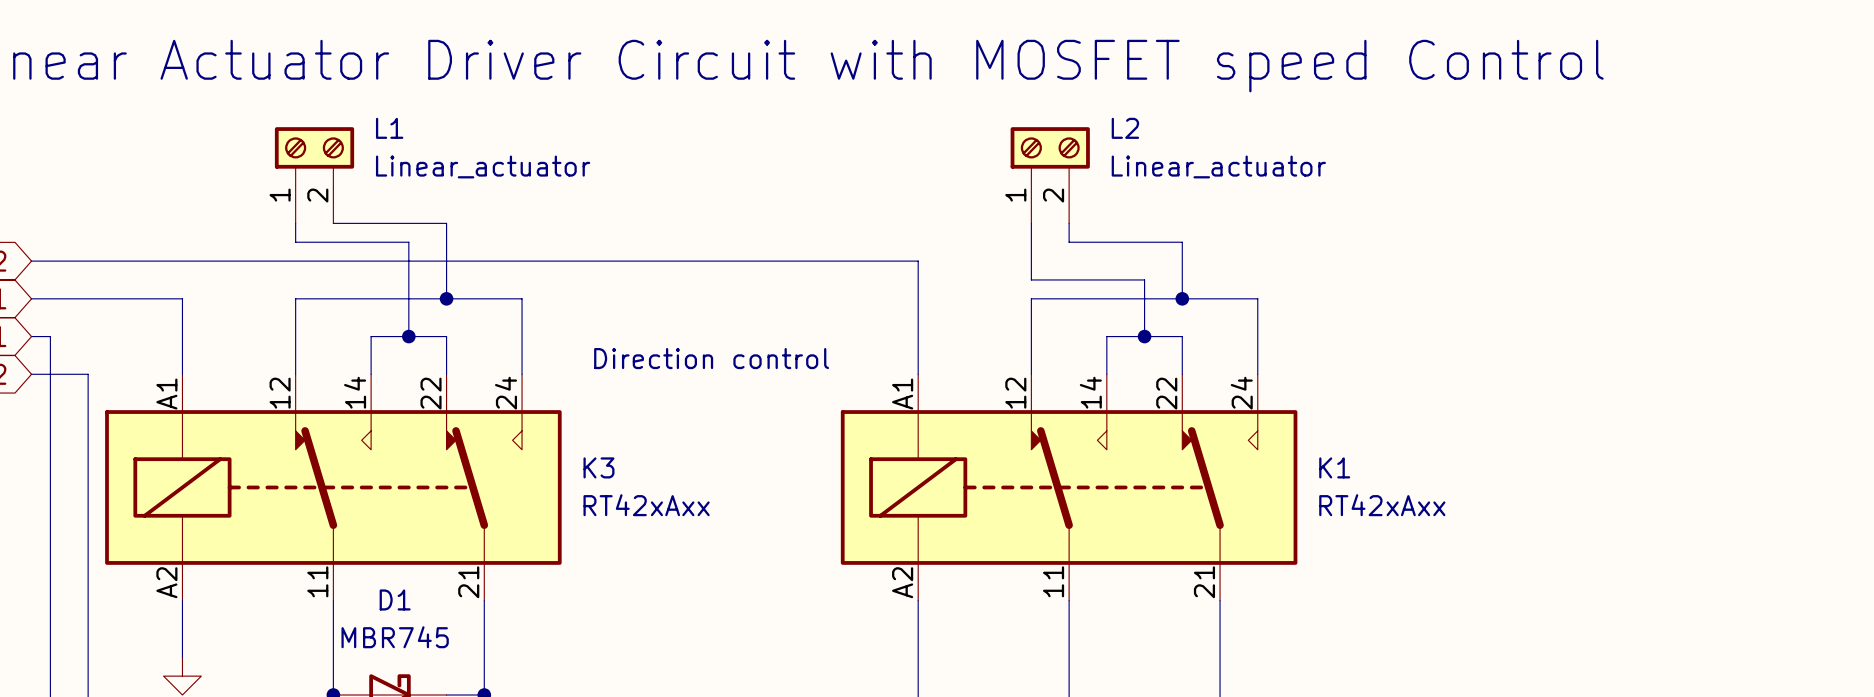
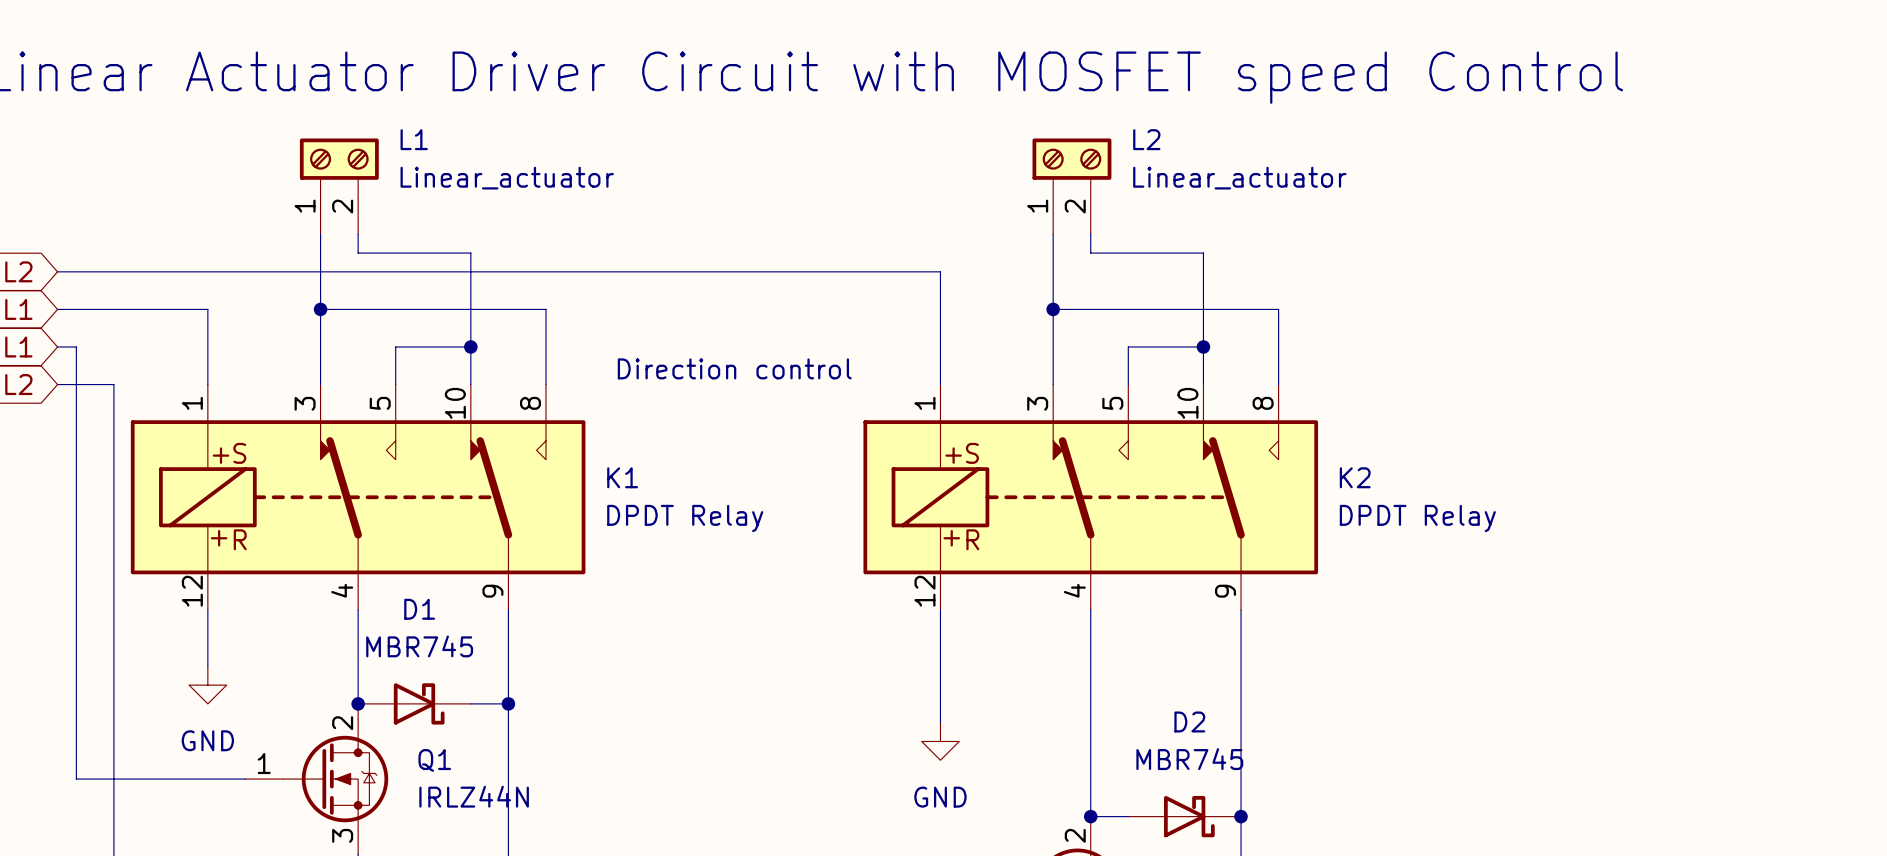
wire: (333, 223) (446, 223) (446, 242) -> (433, 253) (470, 253)
wire: (295, 242) (333, 242) -> (358, 234) (358, 253)
wire: none -> (320, 253) (320, 309)
wire: (408, 242) (408, 336) -> none
wire: (1031, 279) (1144, 279) (1144, 336) -> (1053, 290) (1053, 309)
junction: none -> (320, 309)
wire: none -> (470, 309) (470, 346)
junction: (446, 298) -> none
junction: none -> (1053, 309)
wire: none -> (1203, 309) (1203, 346)
junction: (1182, 298) -> none
junction: (408, 336) -> none
junction: none -> (470, 346)
junction: (1144, 336) -> none
junction: none -> (1203, 346)
K1 symbol: [840, 374, 1298, 601] -> [130, 384, 586, 610]
K3: RT42xAxx (333, 487) -> none
K2: none -> DPDT Relay (1090, 497)
K1 value: RT42xAxx (1382, 505) -> DPDT Relay (685, 518)

